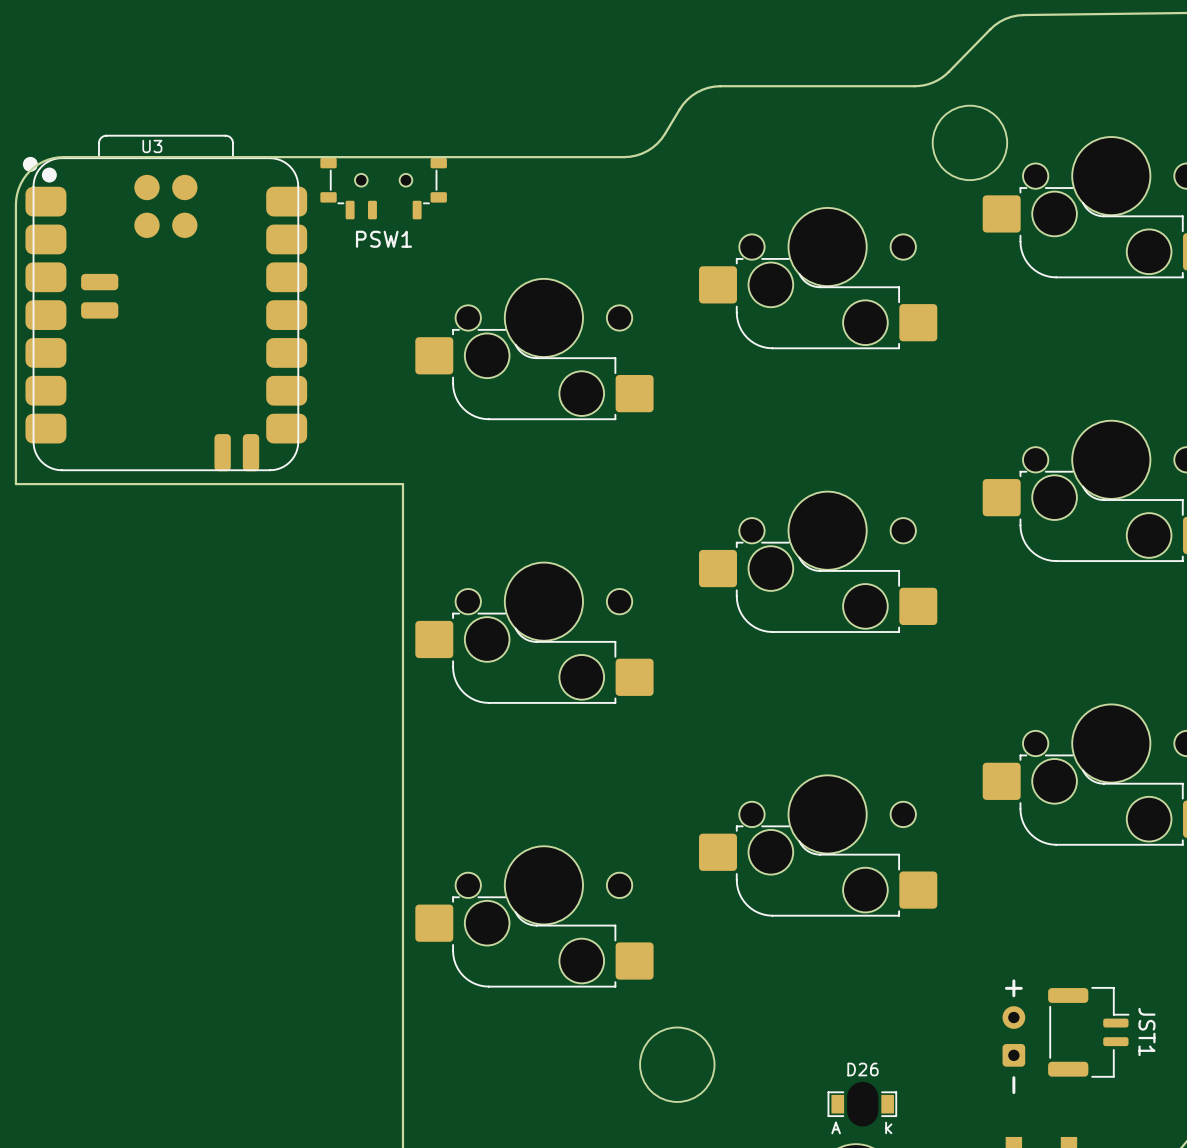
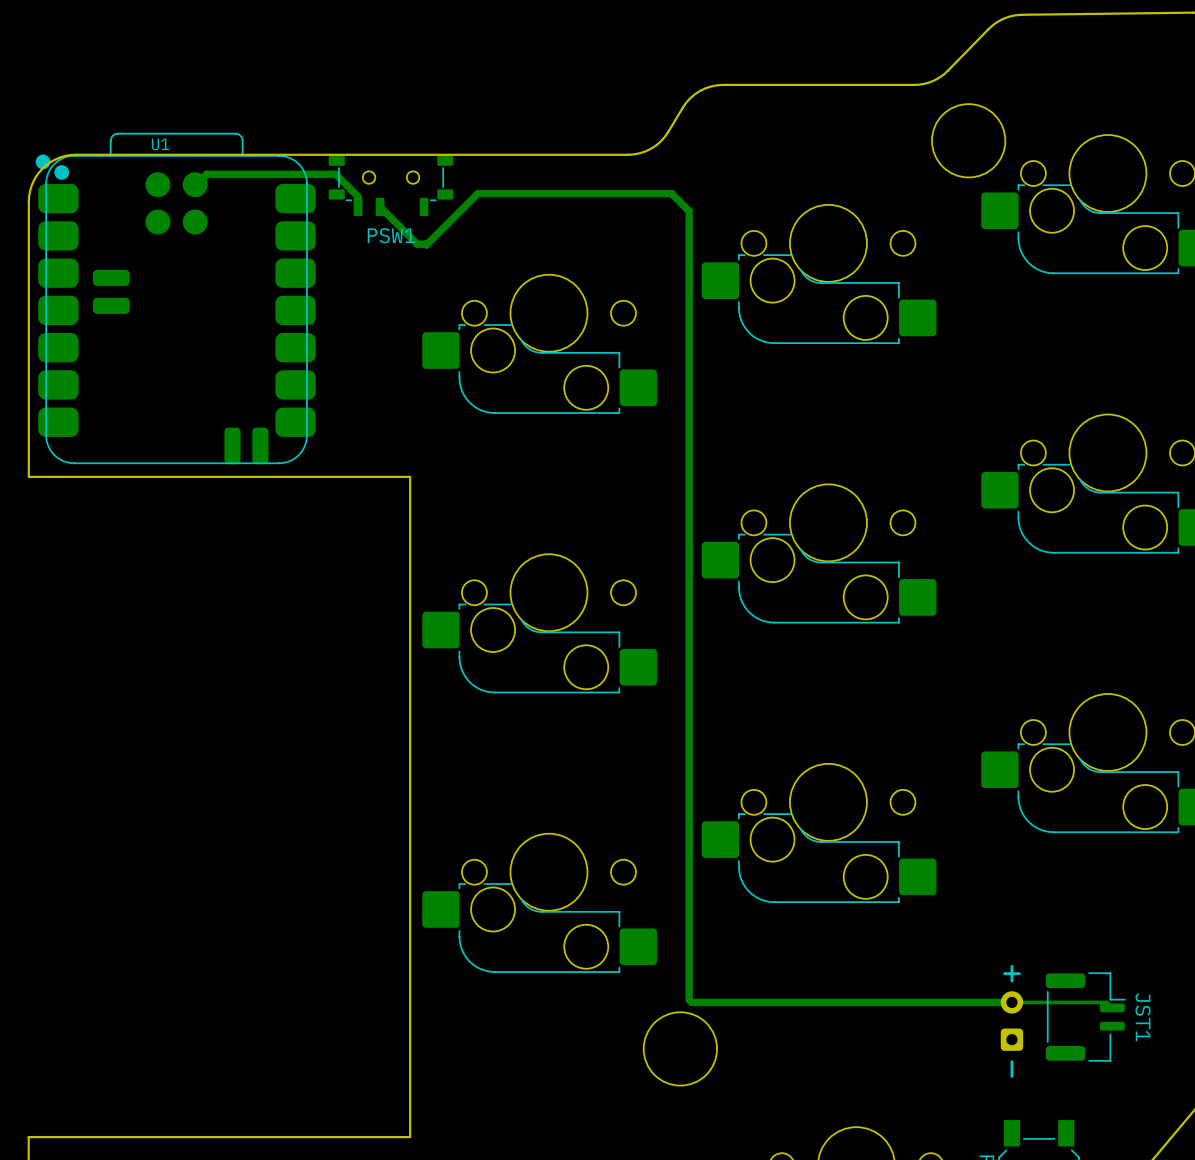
U3 name: U3 (152, 146) -> U1 (160, 144)
track: none -> (194, 186) (206, 174) (335, 174) (358, 196) (358, 206)
track: none -> (380, 206) (417, 244) (426, 244) (477, 193) (671, 193) (689, 211) (689, 999) (691, 1002) (1107, 1002) (1112, 1007)
D26: (862, 1108) -> none

